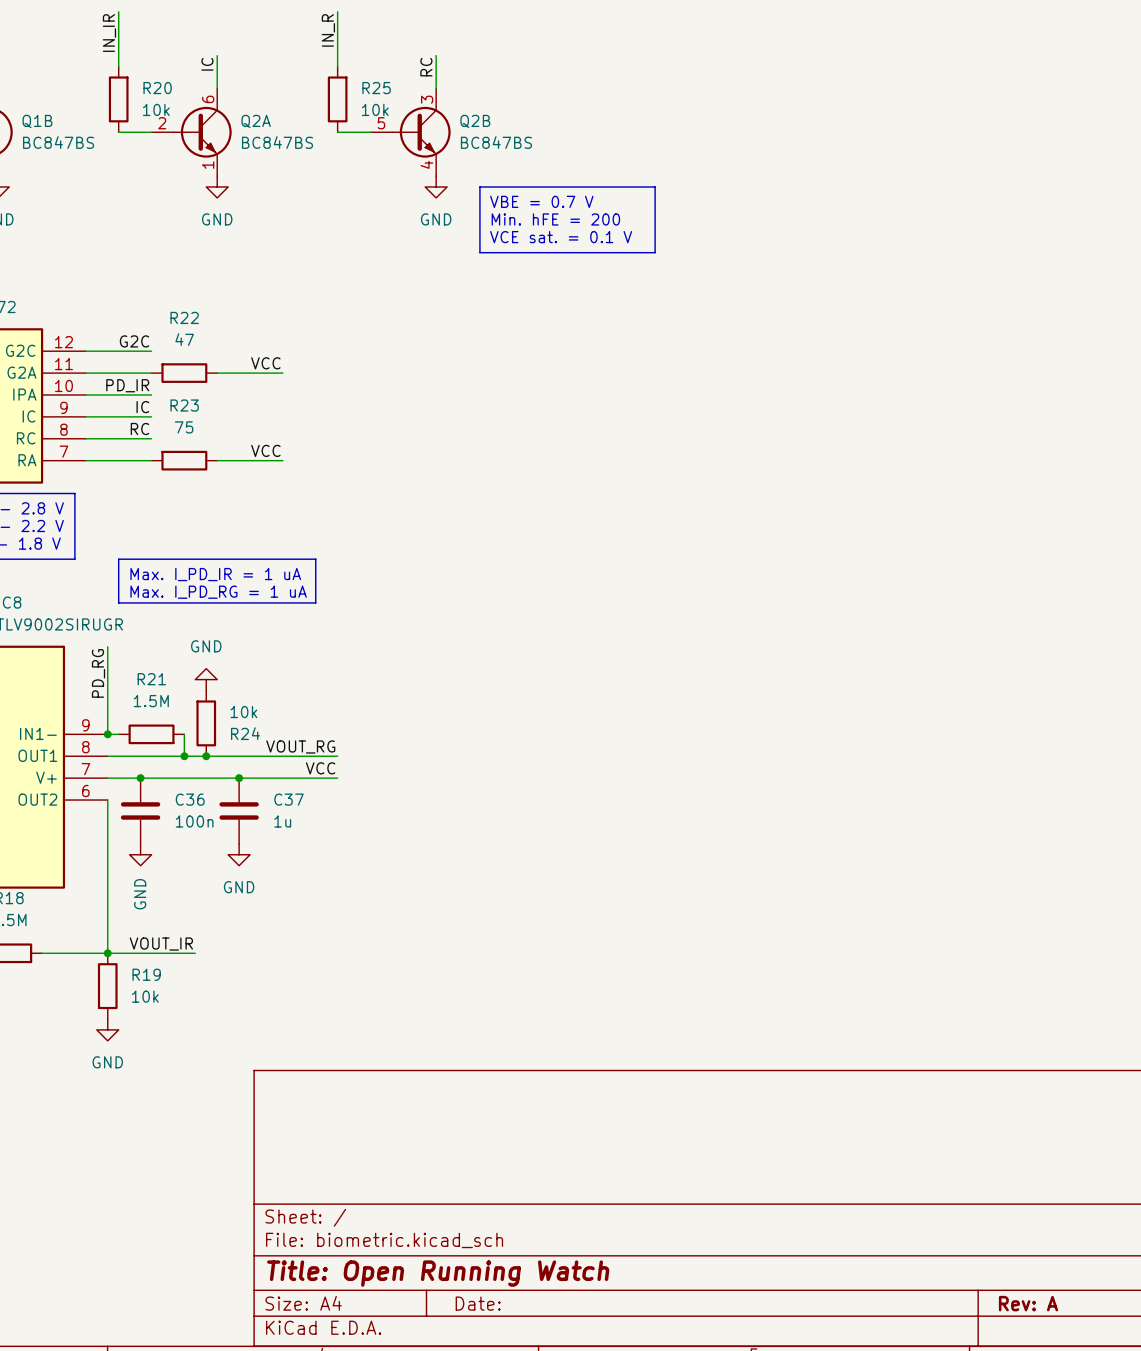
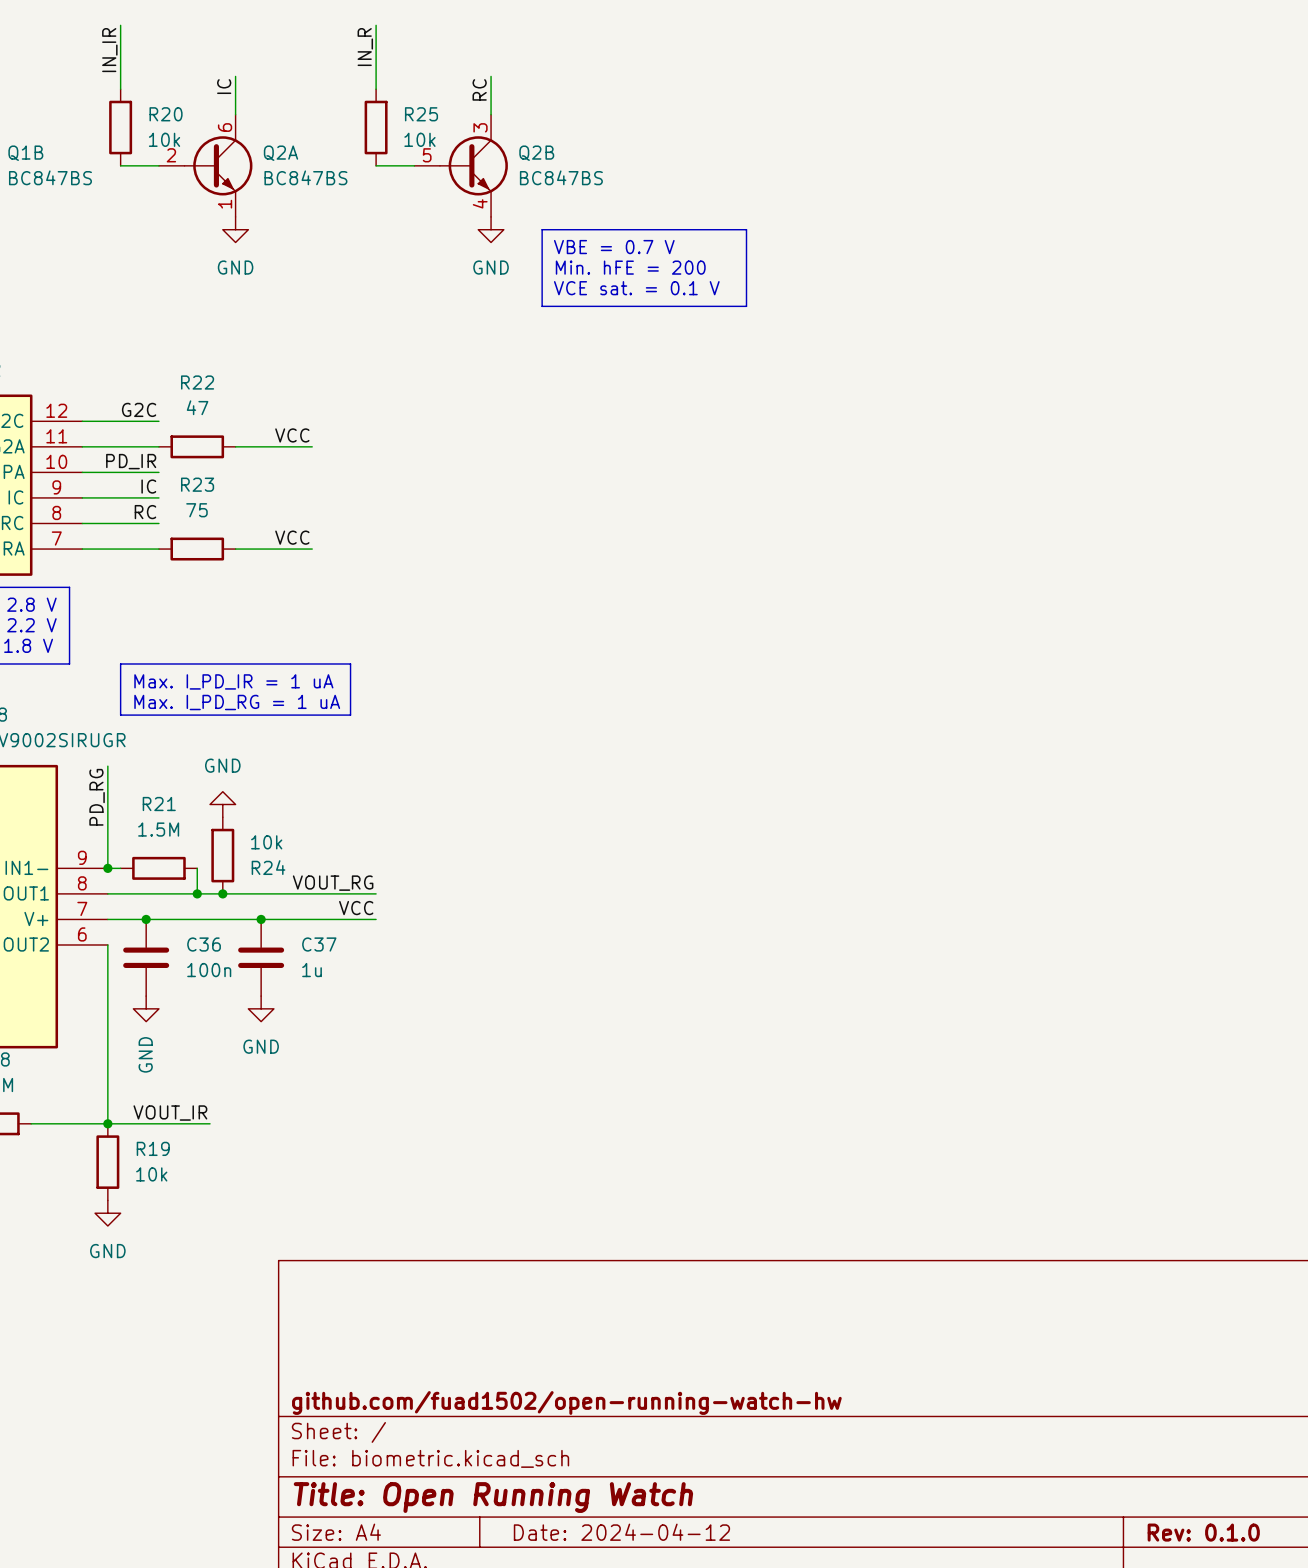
title block: none -> github.com/fuad1502/open-running-watch-hw (566, 1402)
title block: Date: (478, 1303) -> Date: 2024-04-12 (621, 1532)
title block: Rev: A (1028, 1303) -> Rev: 0.1.0 (1203, 1532)

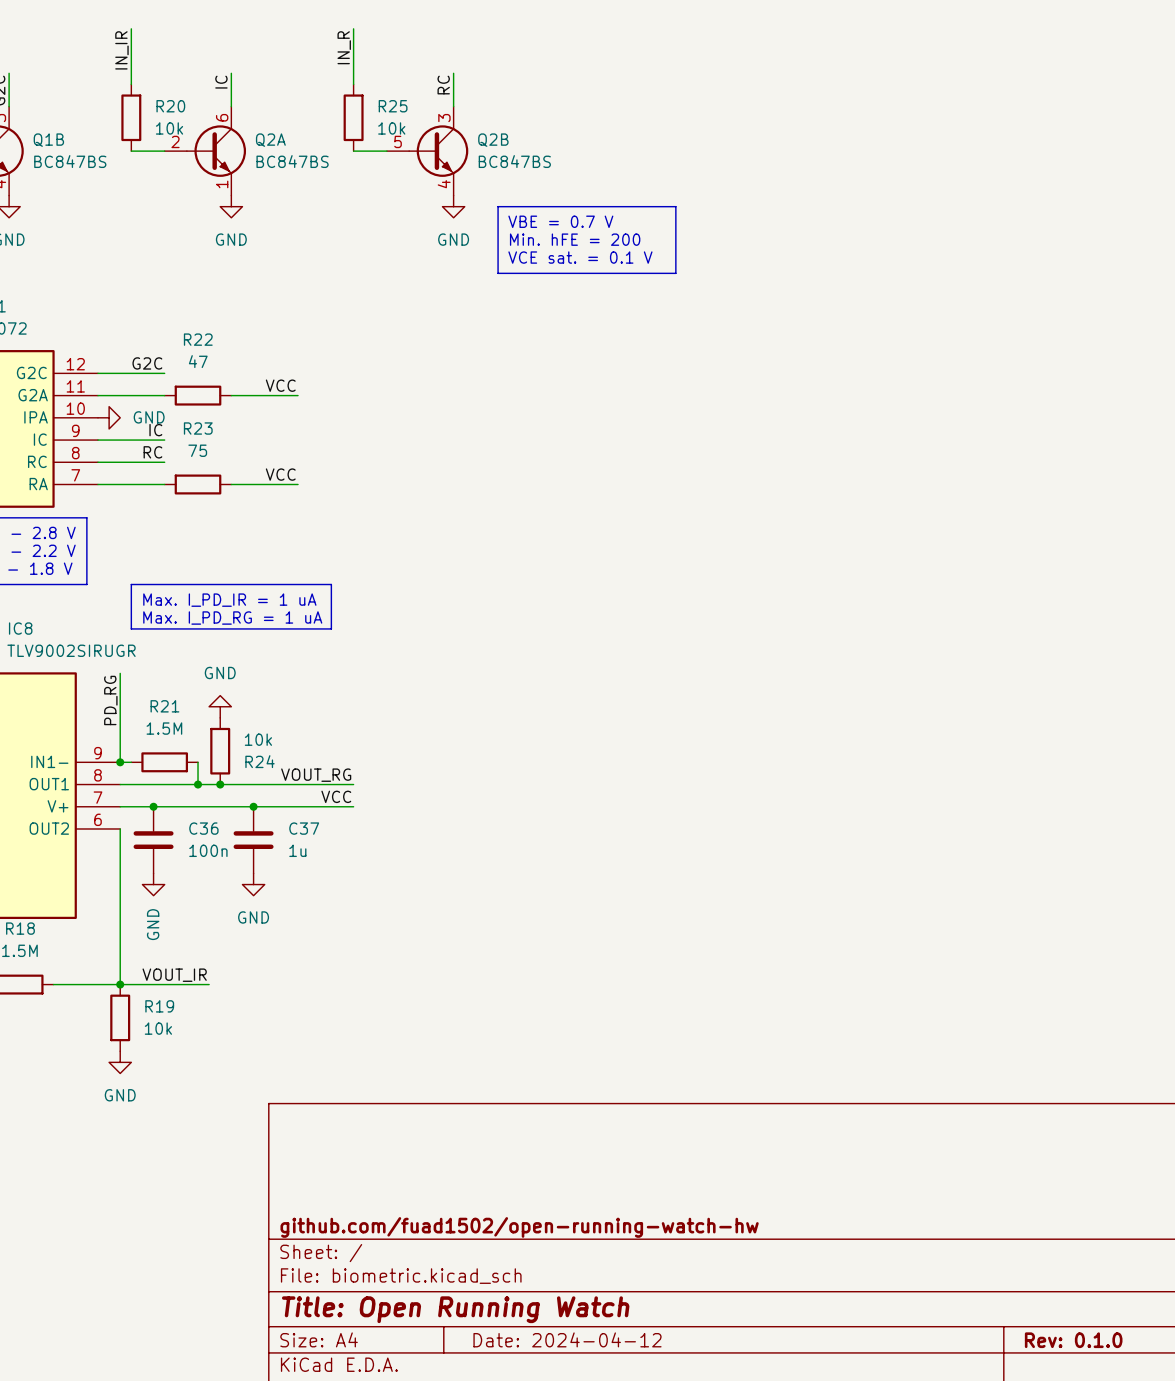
label: PD_IR (131, 461) -> none
wire: (82, 472) (158, 472) -> none
power symbol: none -> GND (109, 417)

